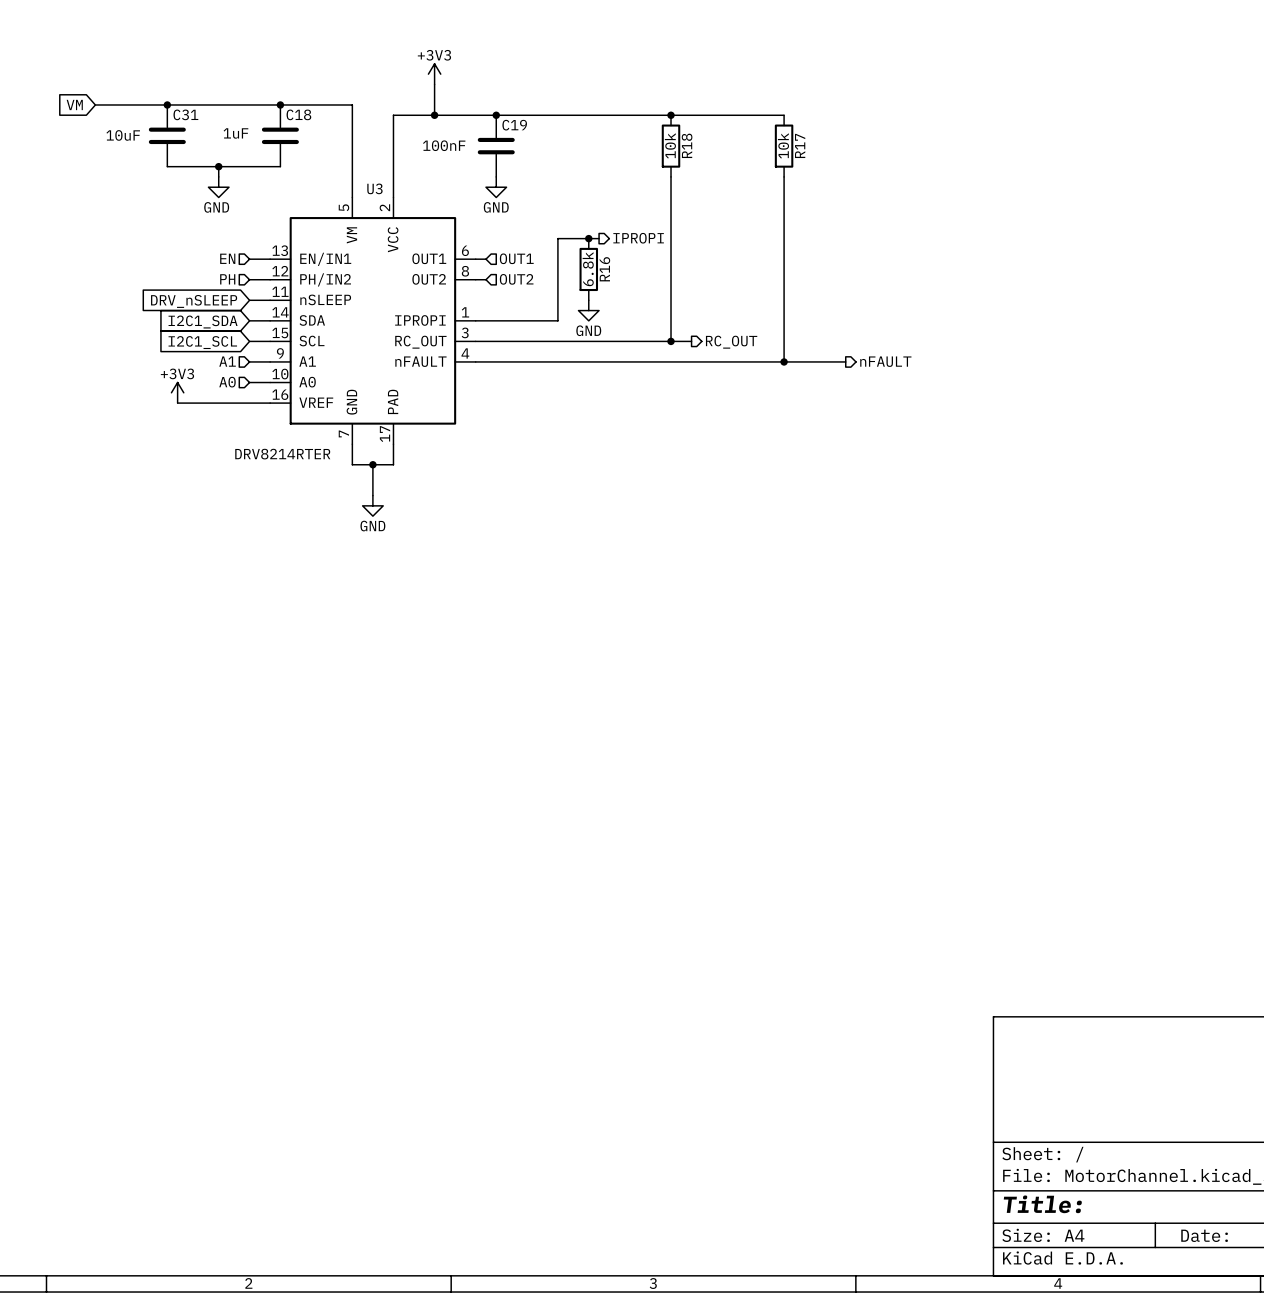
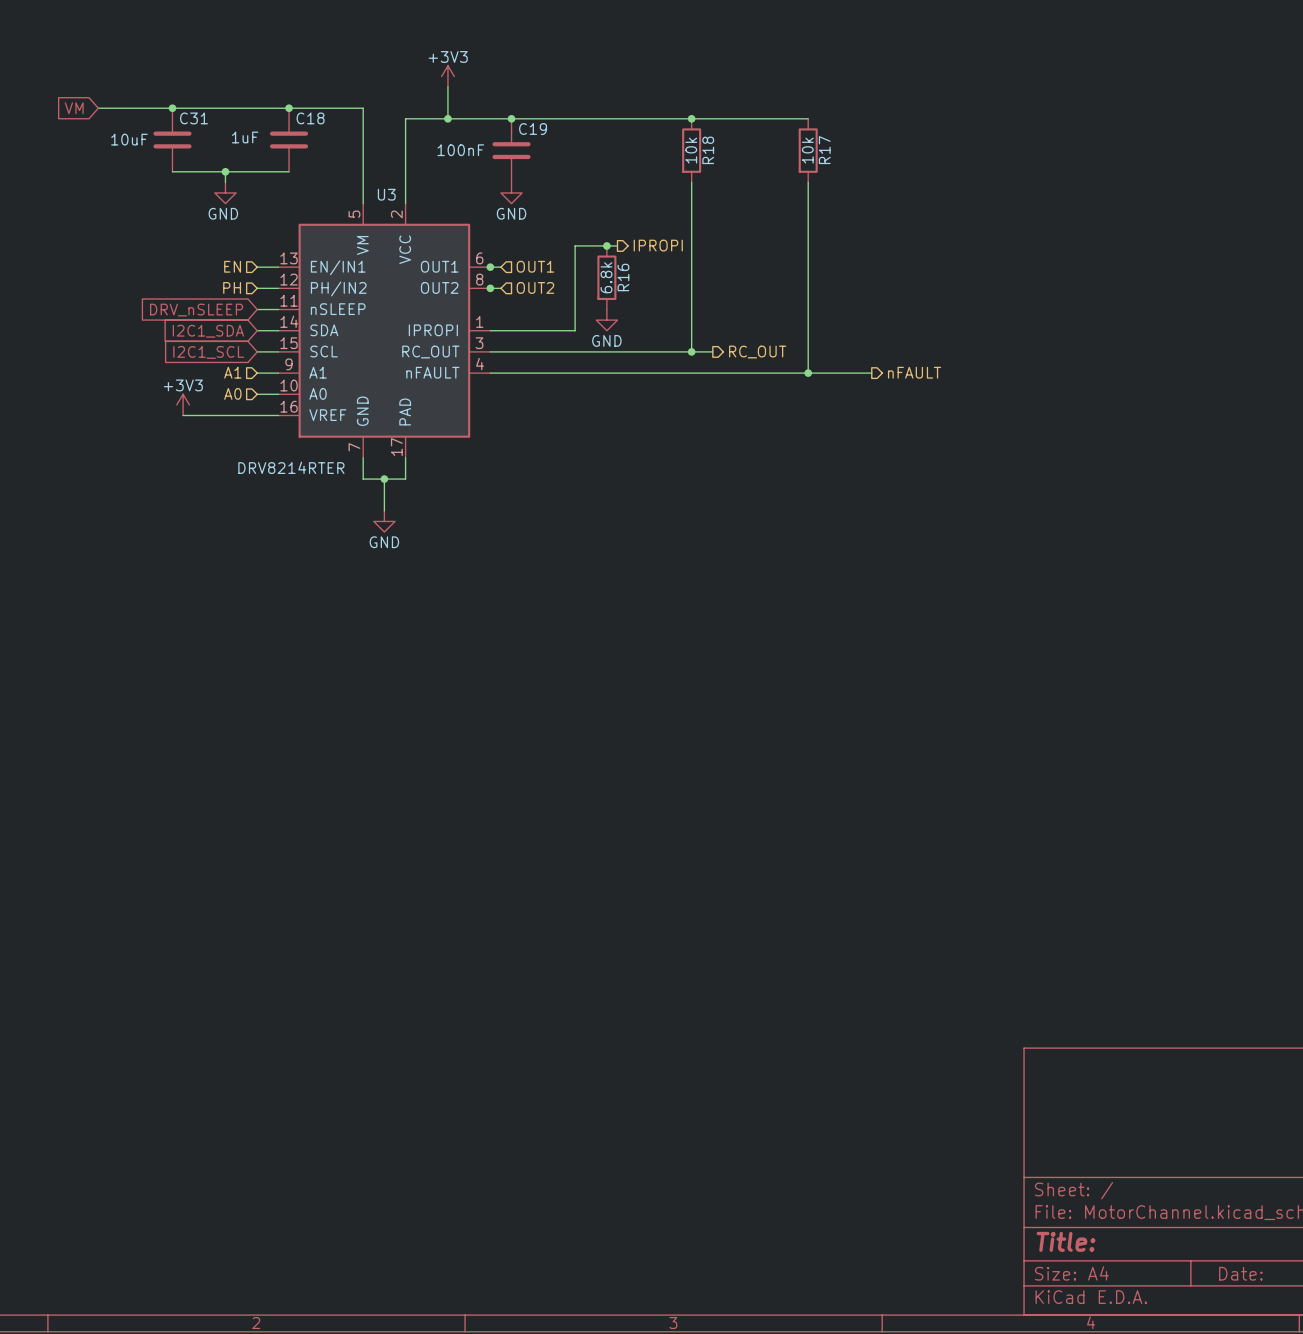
junction: none -> (490, 267)
junction: none -> (490, 288)

